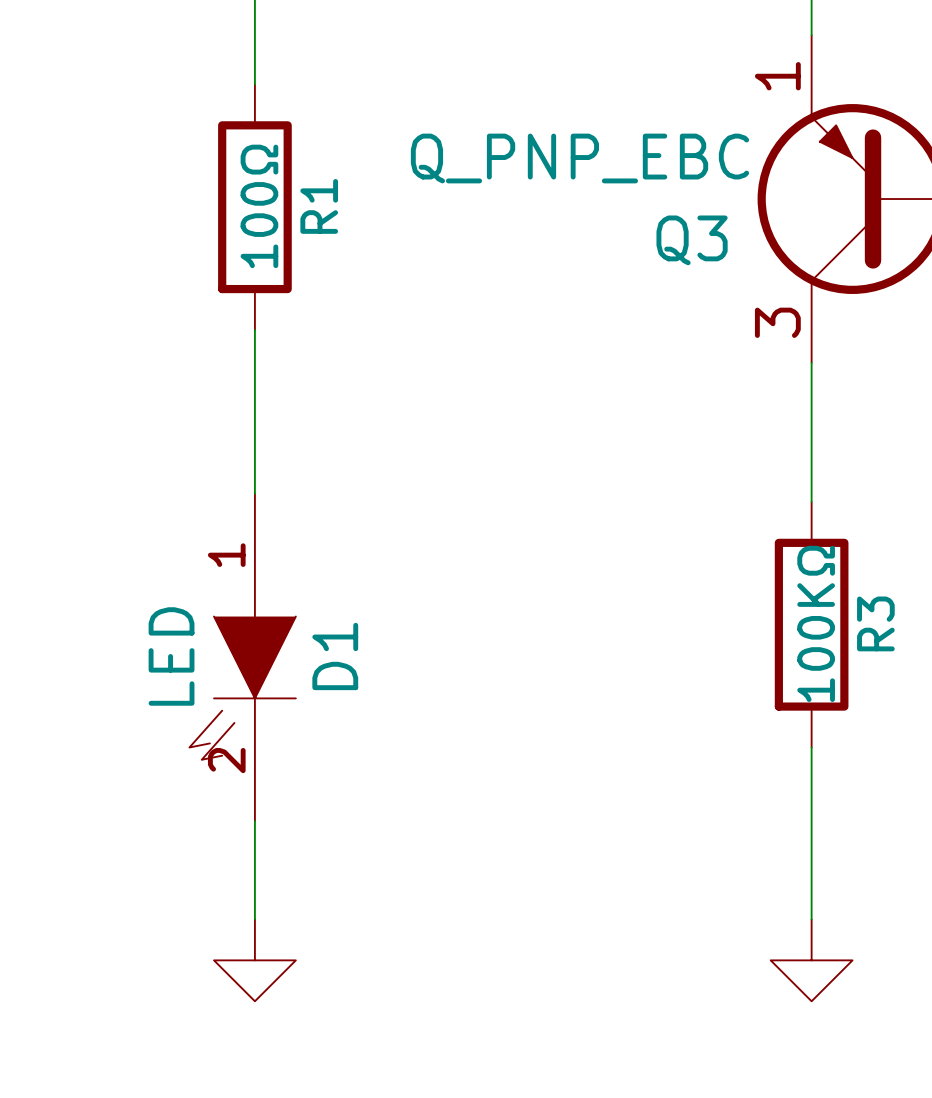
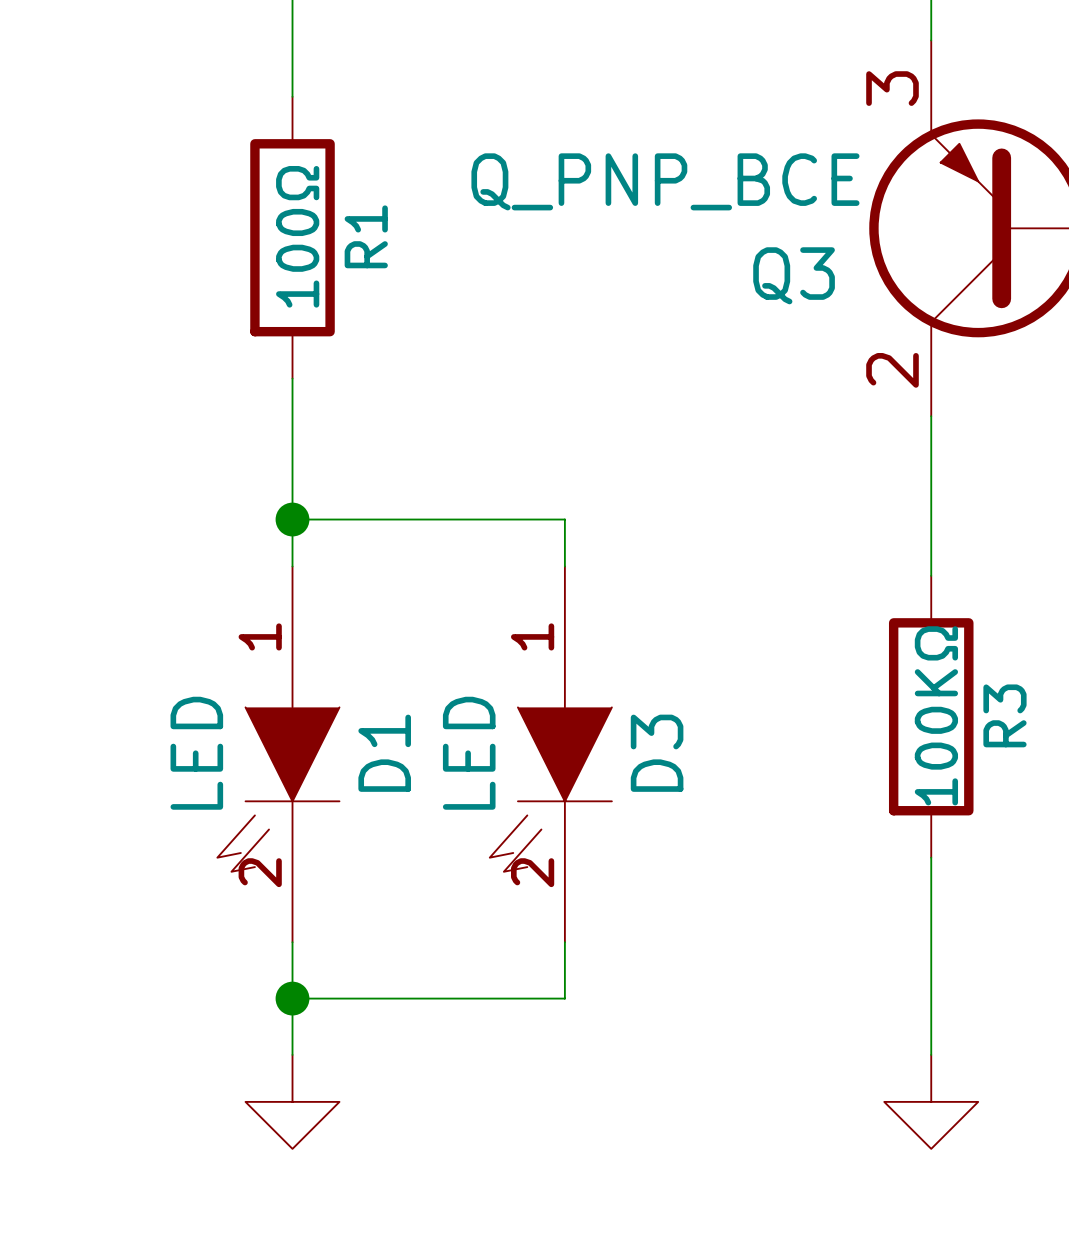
Q3 pin number: 1 (777, 76) -> 3 (892, 88)
Q3 value: Q_PNP_EBC (579, 158) -> Q_PNP_BCE (665, 181)
Q3 pin number: 3 (777, 322) -> 2 (892, 370)
wire: none -> (292, 519) (564, 519) (564, 566)
junction: none -> (292, 519)
D3: none -> LED (550, 754)
wire: none -> (564, 942) (564, 998) (292, 998)
junction: none -> (292, 998)

